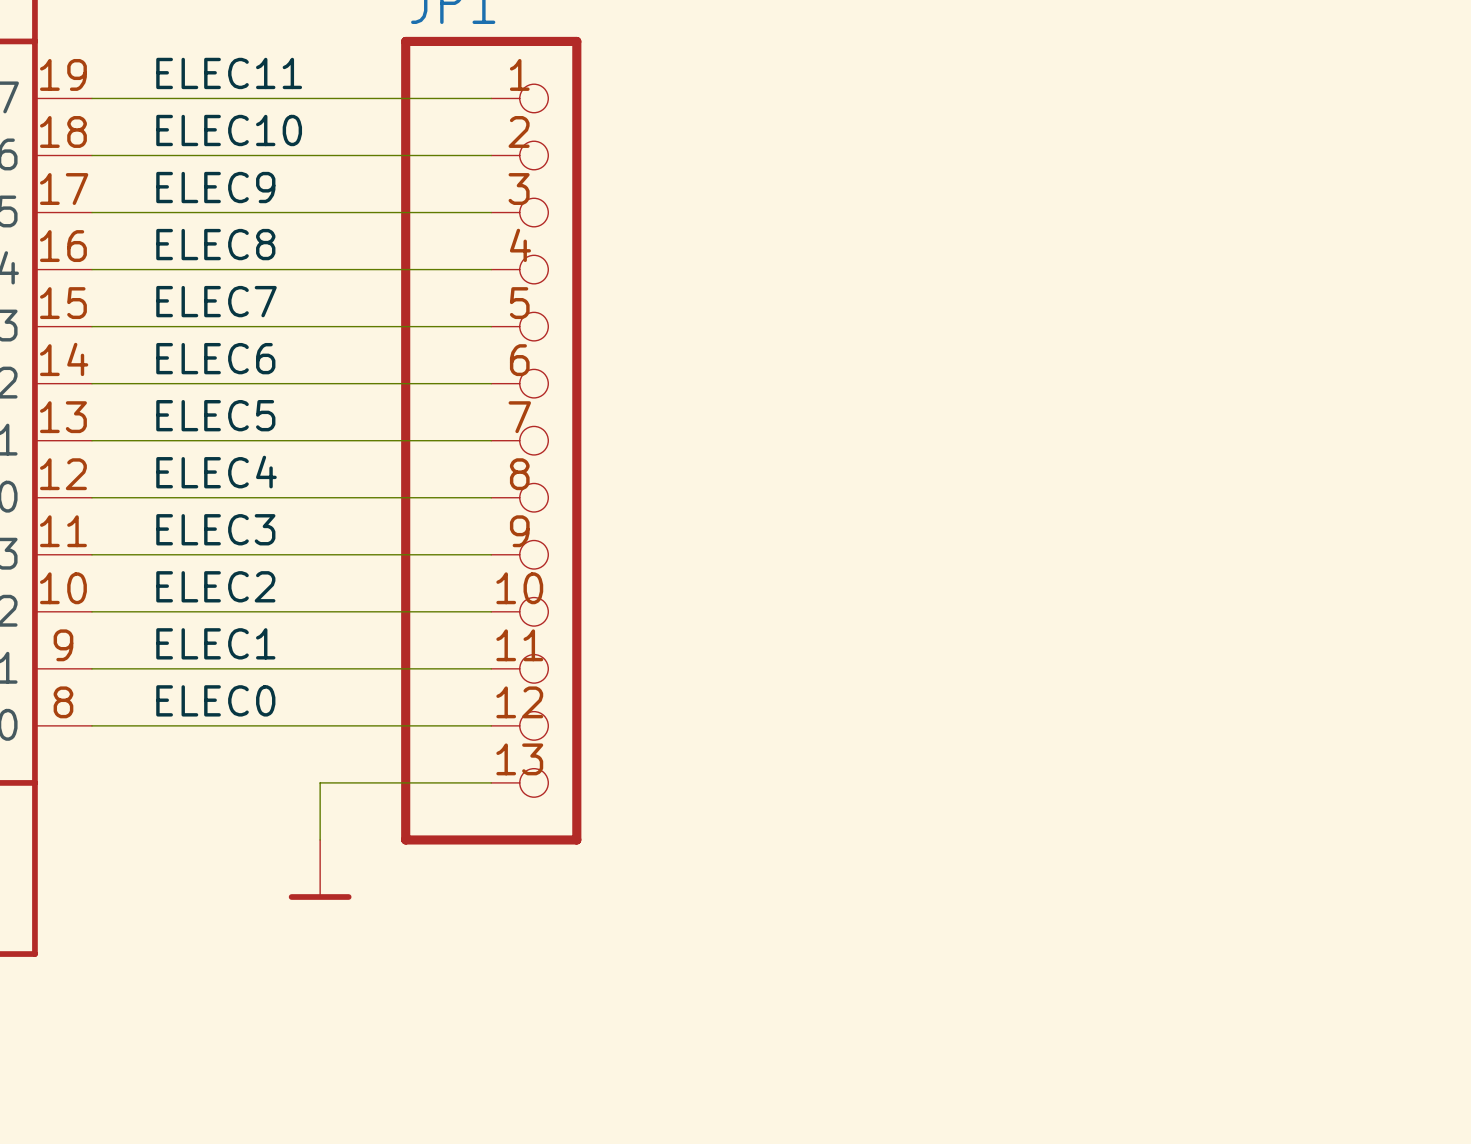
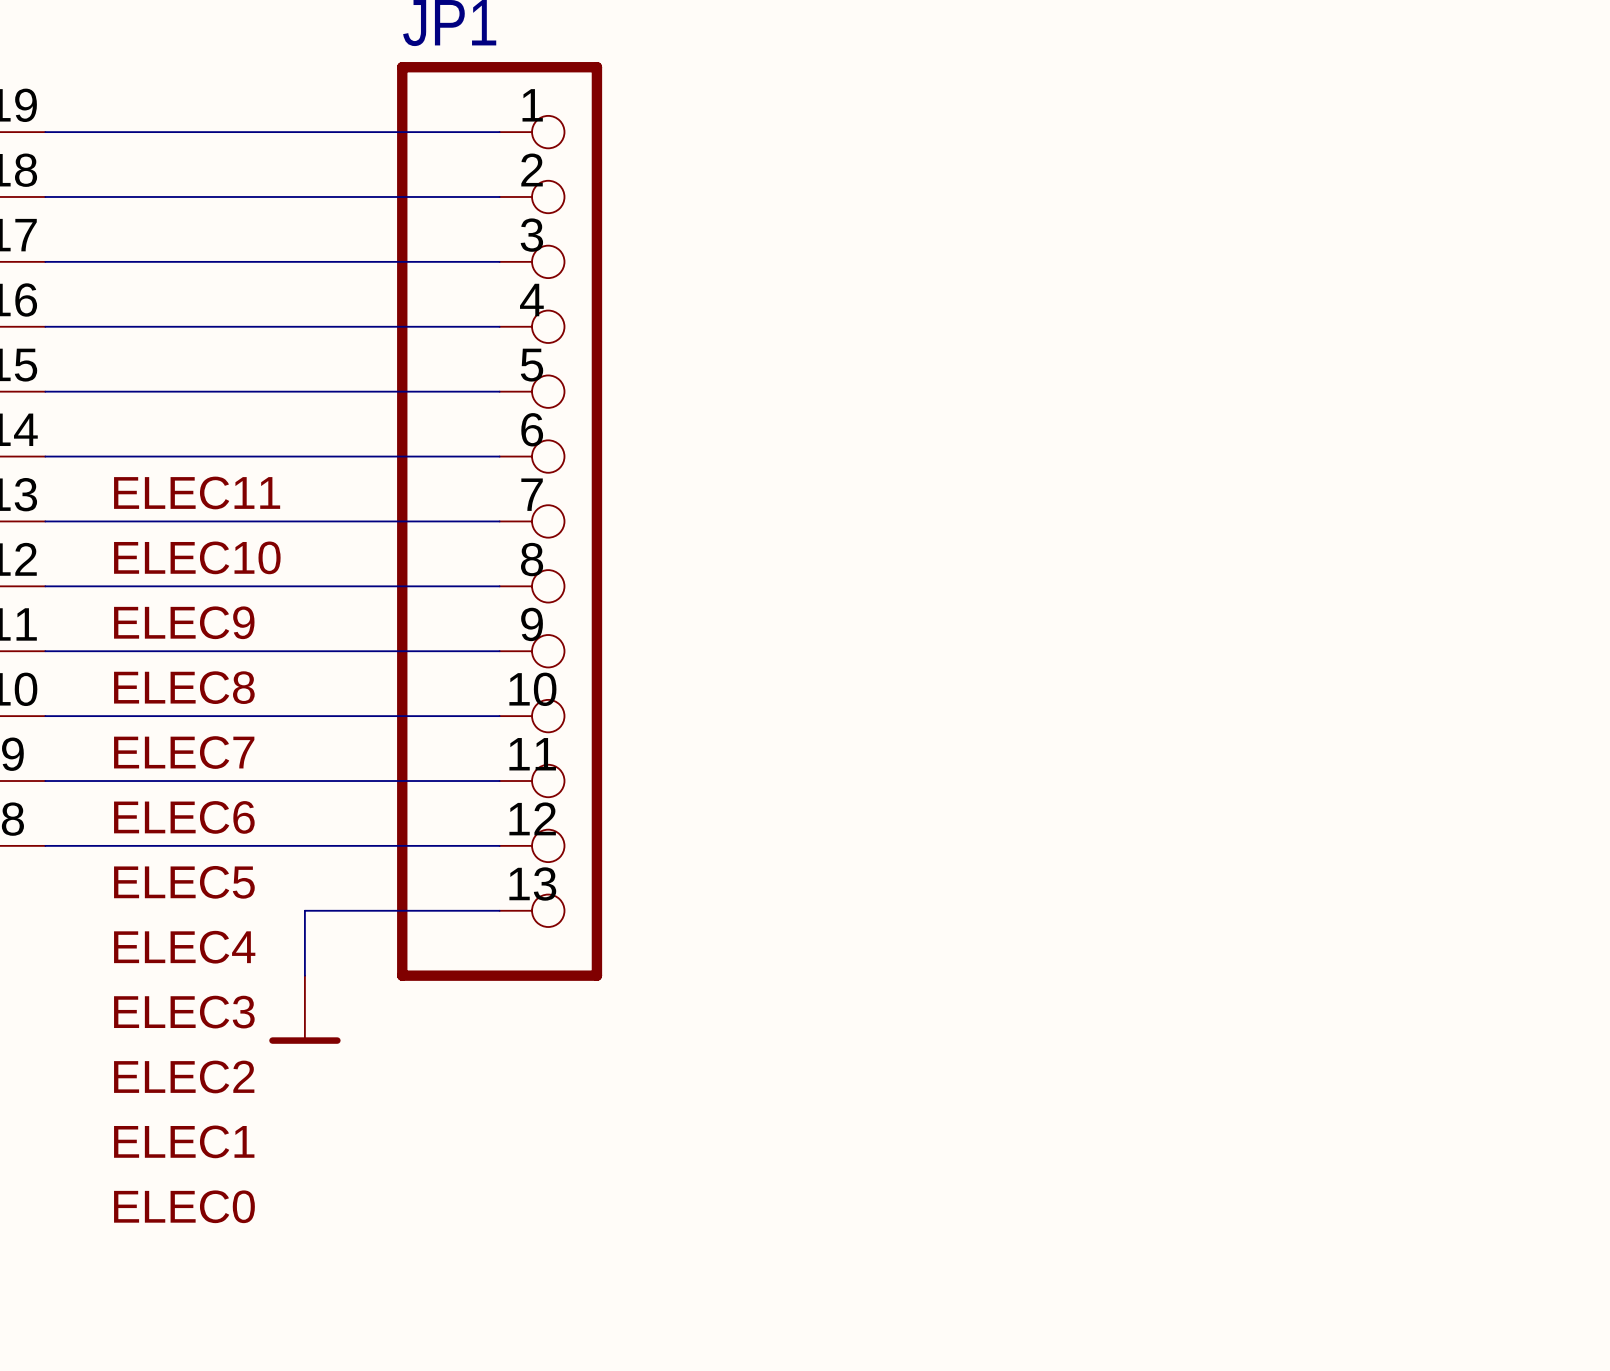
label: ELEC11 (229, 73) -> none
label: ELEC10 (229, 130) -> none
label: ELEC9 (215, 187) -> none
label: ELEC8 (215, 244) -> none
label: ELEC7 (216, 301) -> none
label: ELEC6 (215, 358) -> none
label: ELEC5 (215, 415) -> ELEC11 (197, 492)
label: ELEC4 (216, 472) -> ELEC10 (197, 557)
label: ELEC3 (215, 529) -> ELEC9 (184, 622)
label: ELEC2 (215, 586) -> ELEC8 (184, 687)
label: ELEC1 (215, 643) -> ELEC7 (184, 752)
label: ELEC0 (215, 700) -> ELEC6 (184, 817)
label: none -> ELEC5 (184, 882)
label: none -> ELEC4 (184, 947)
label: none -> ELEC3 (184, 1012)
label: none -> ELEC2 (184, 1076)
label: none -> ELEC1 (184, 1141)
label: none -> ELEC0 (184, 1206)

